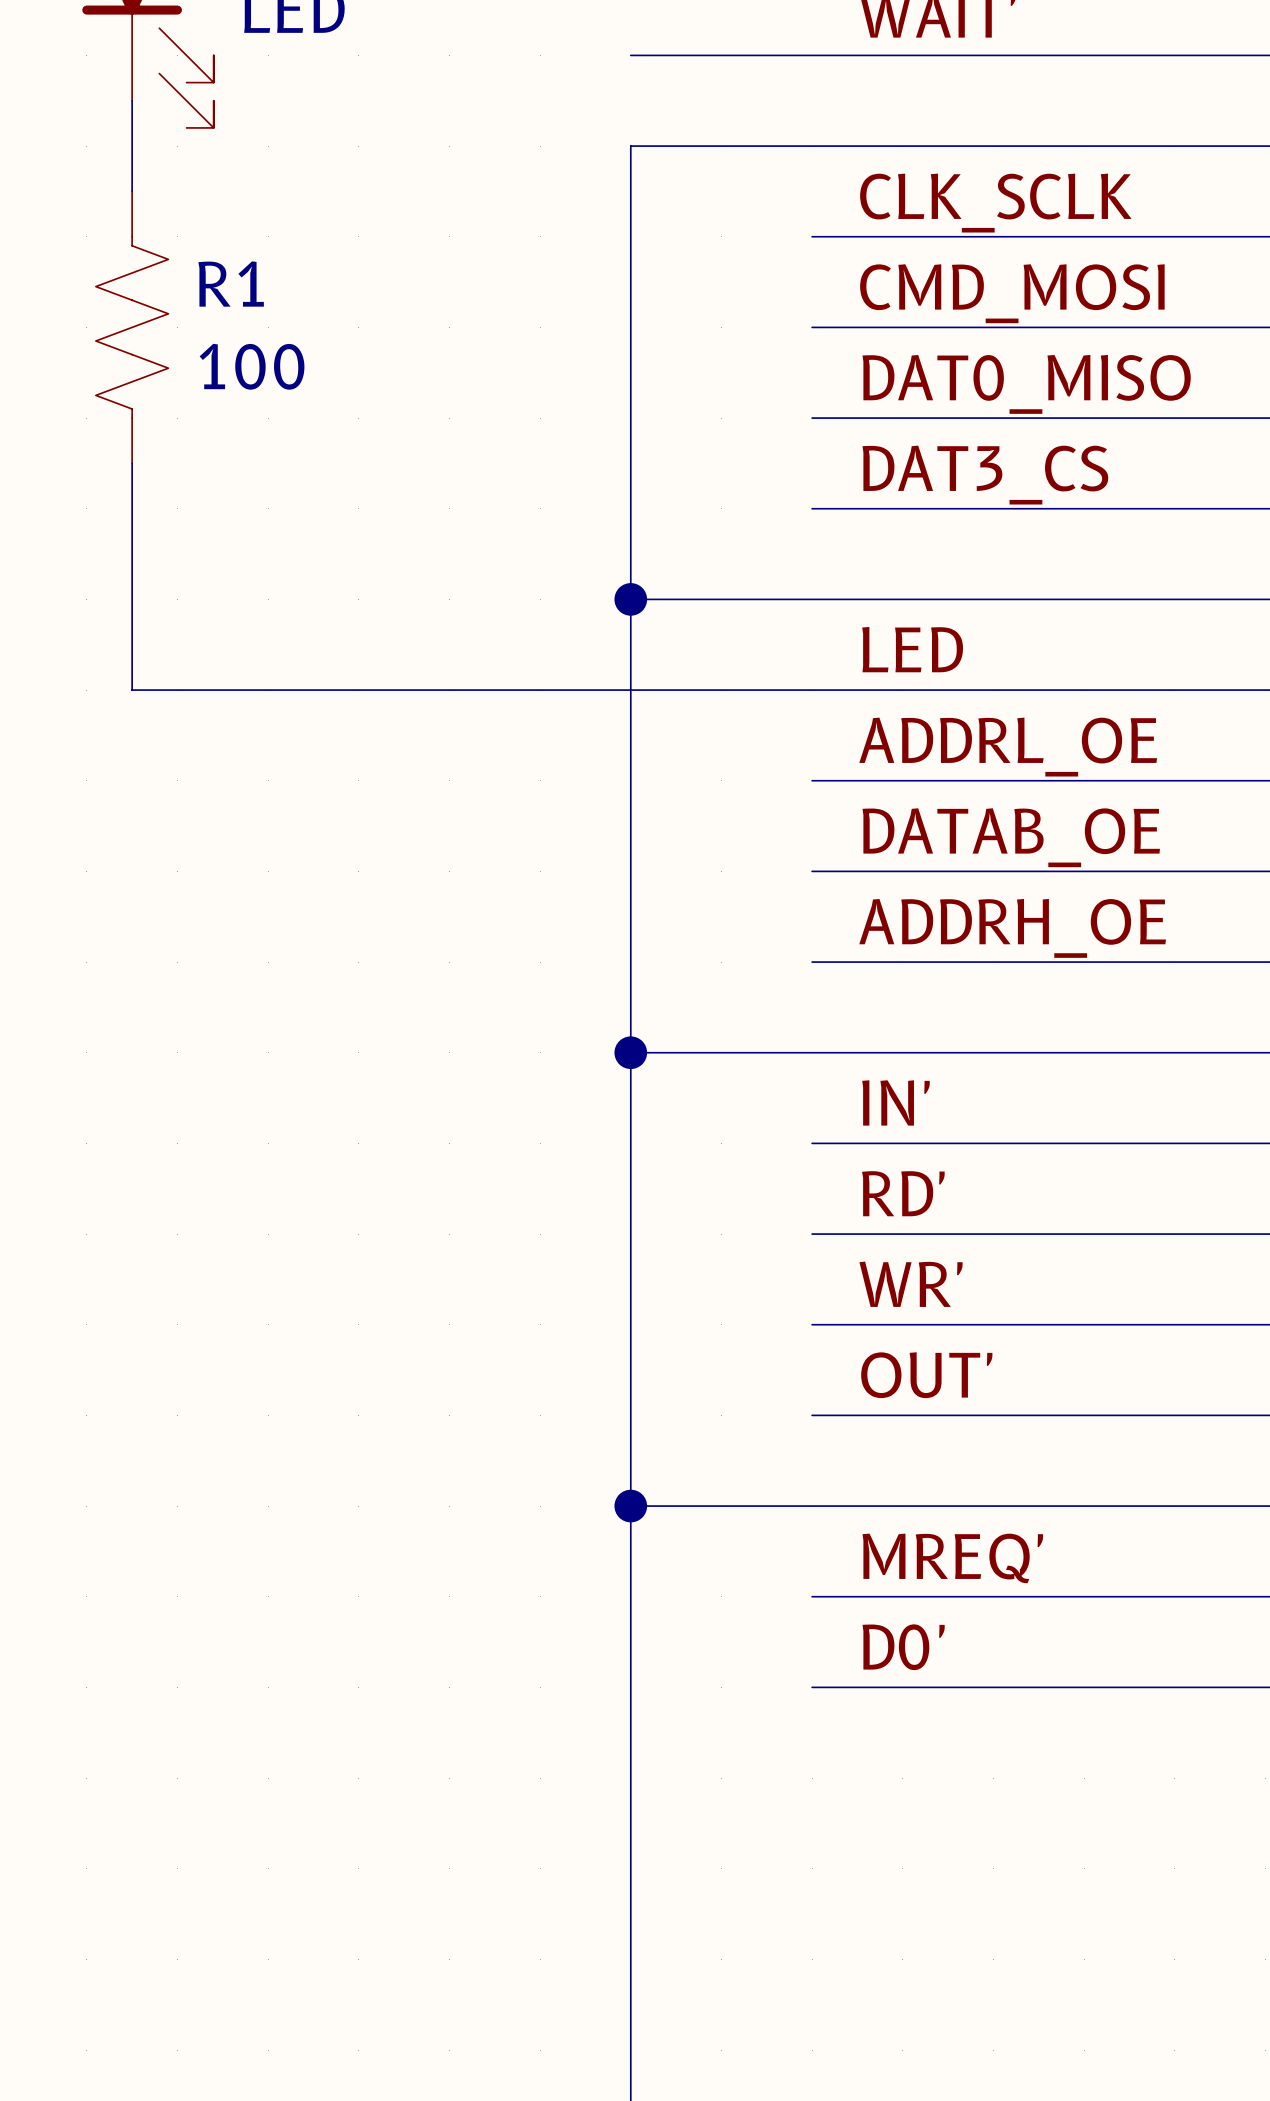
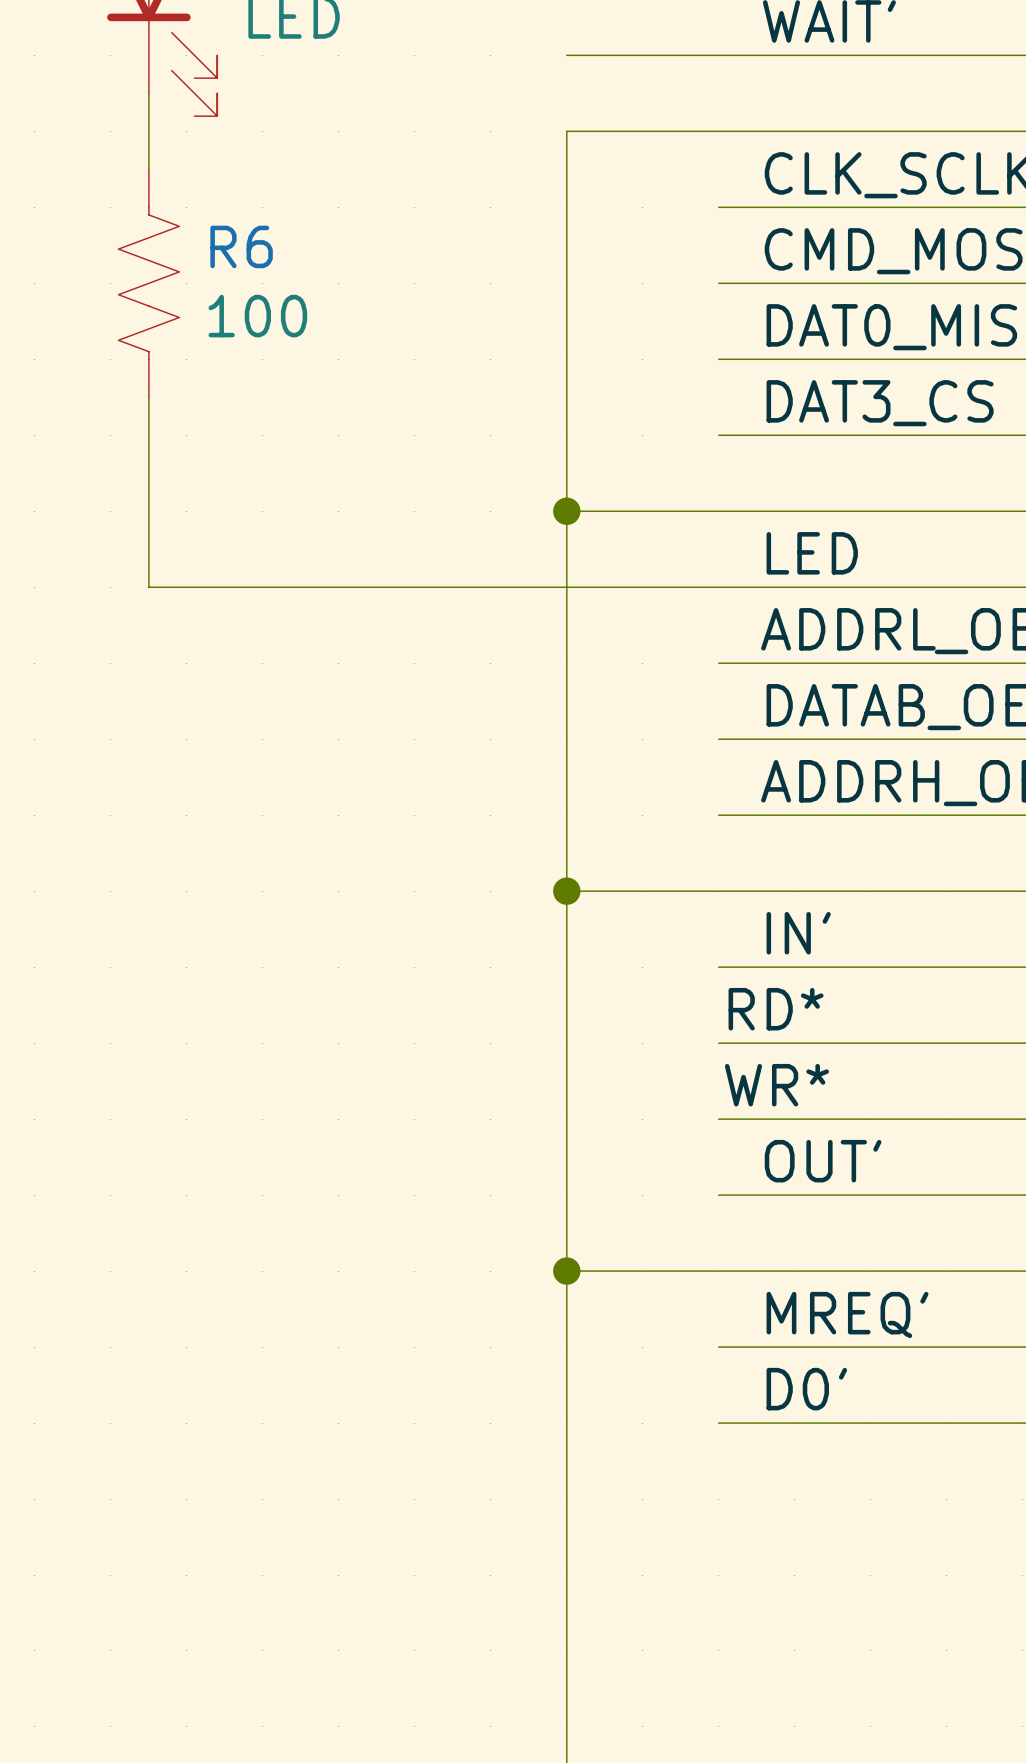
R1 name: R1 (231, 284) -> R6 (241, 246)
label: RD' (903, 1193) -> RD* (776, 1009)
label: WR' (911, 1284) -> WR* (776, 1085)

